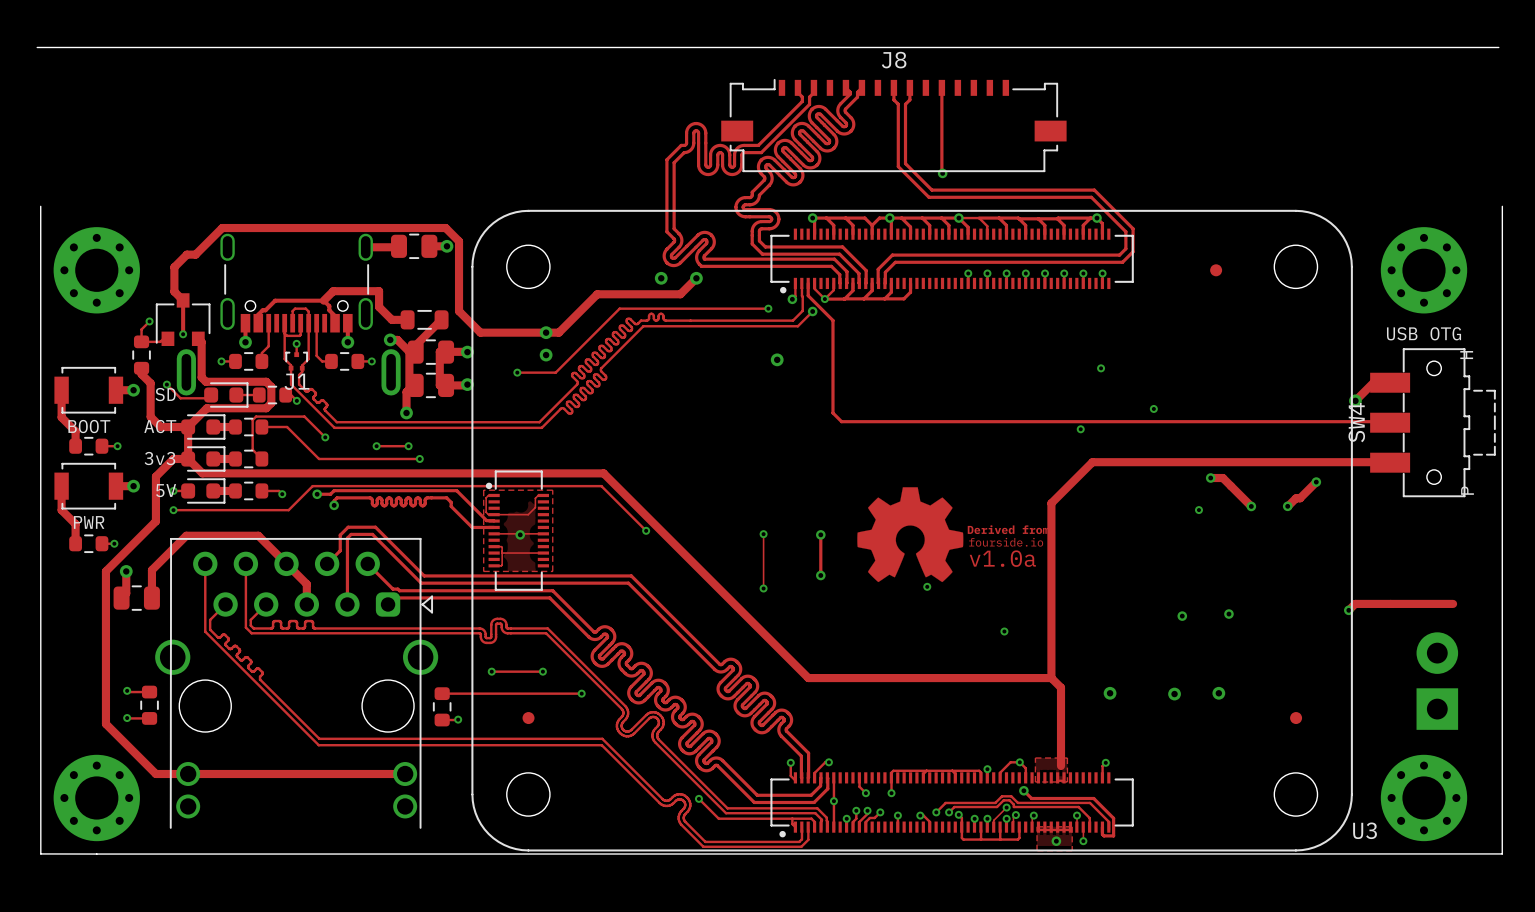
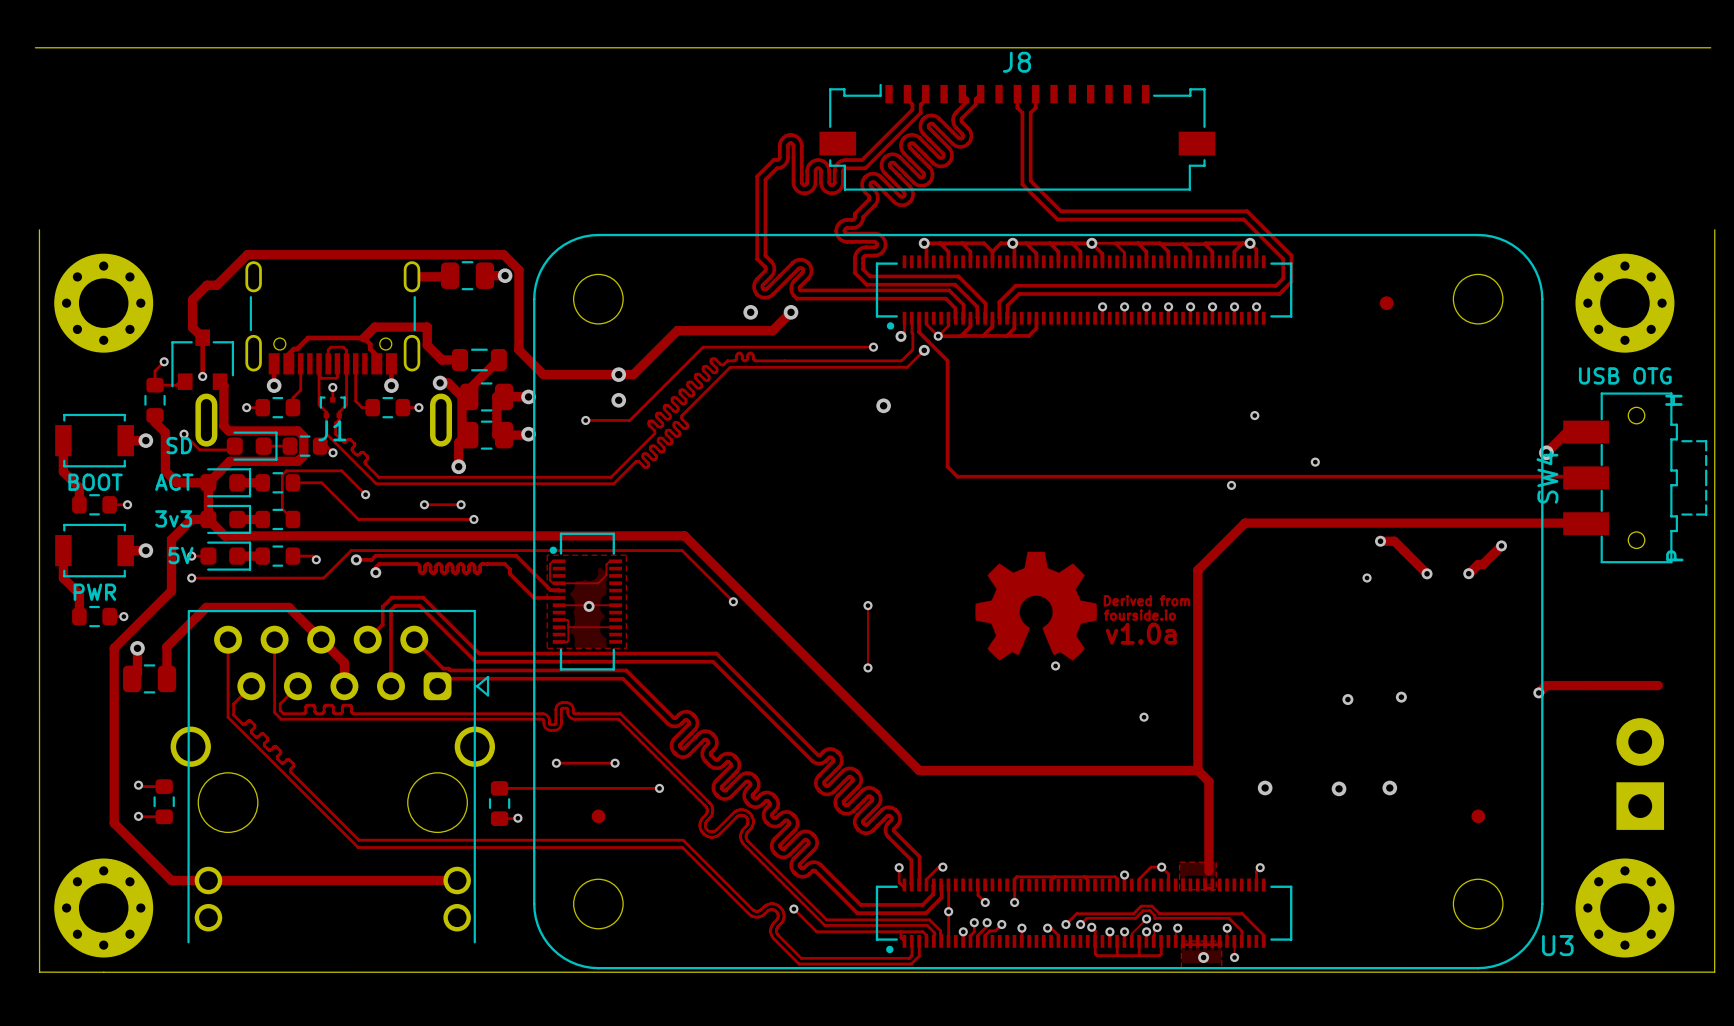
track: (941, 87) (942, 173) -> none
via: (942, 173) -> none
track: (820, 534) (820, 575) -> none
via: (820, 534) -> none
via: (820, 575) -> none
track: (1023, 790) (1031, 798) (1093, 798) (1113, 818) (1113, 835) (1104, 835) (1102, 827) -> none
via: (1023, 790) -> none

